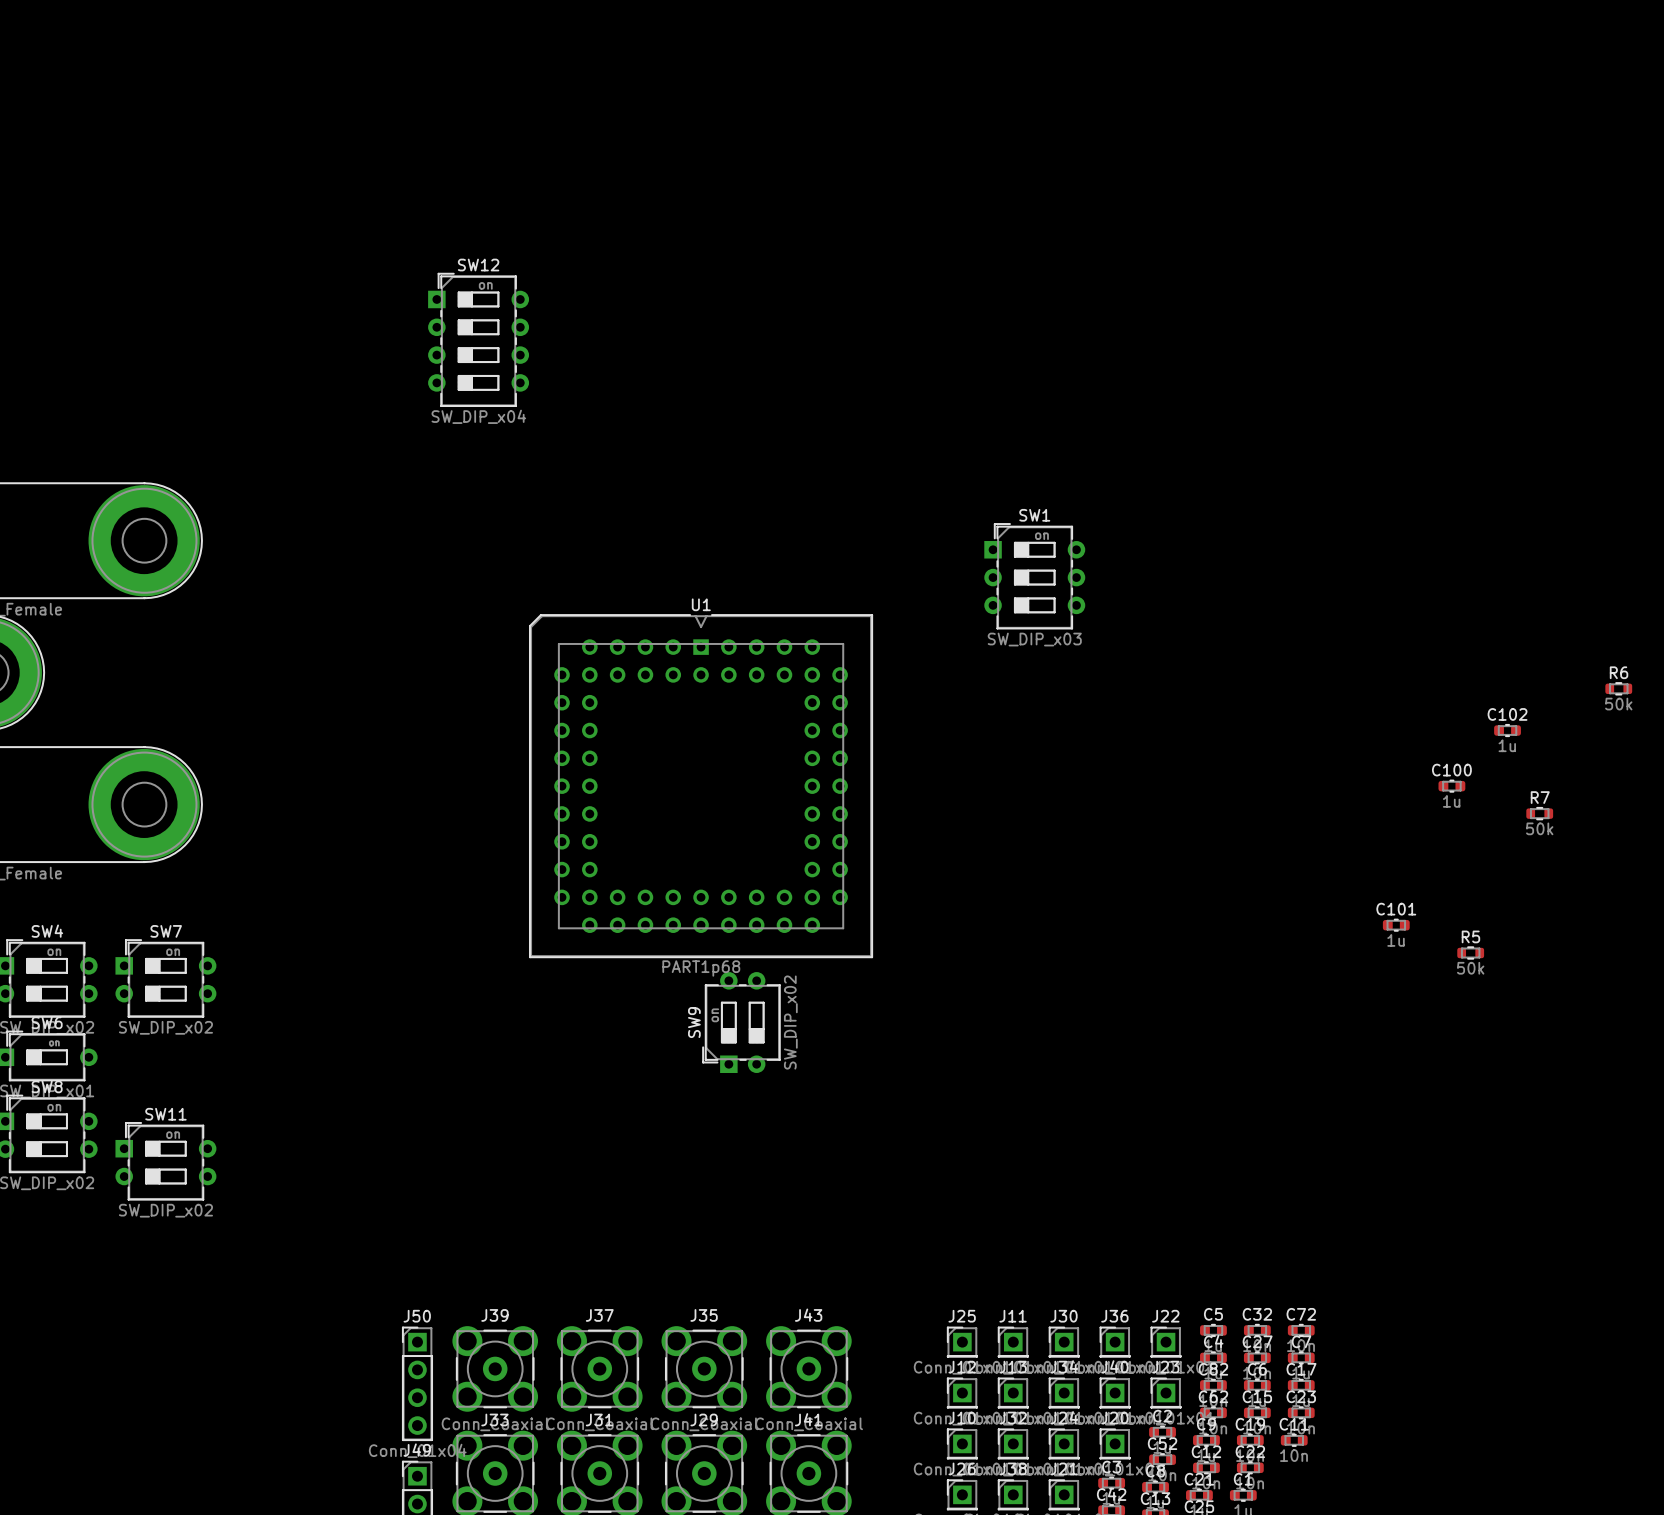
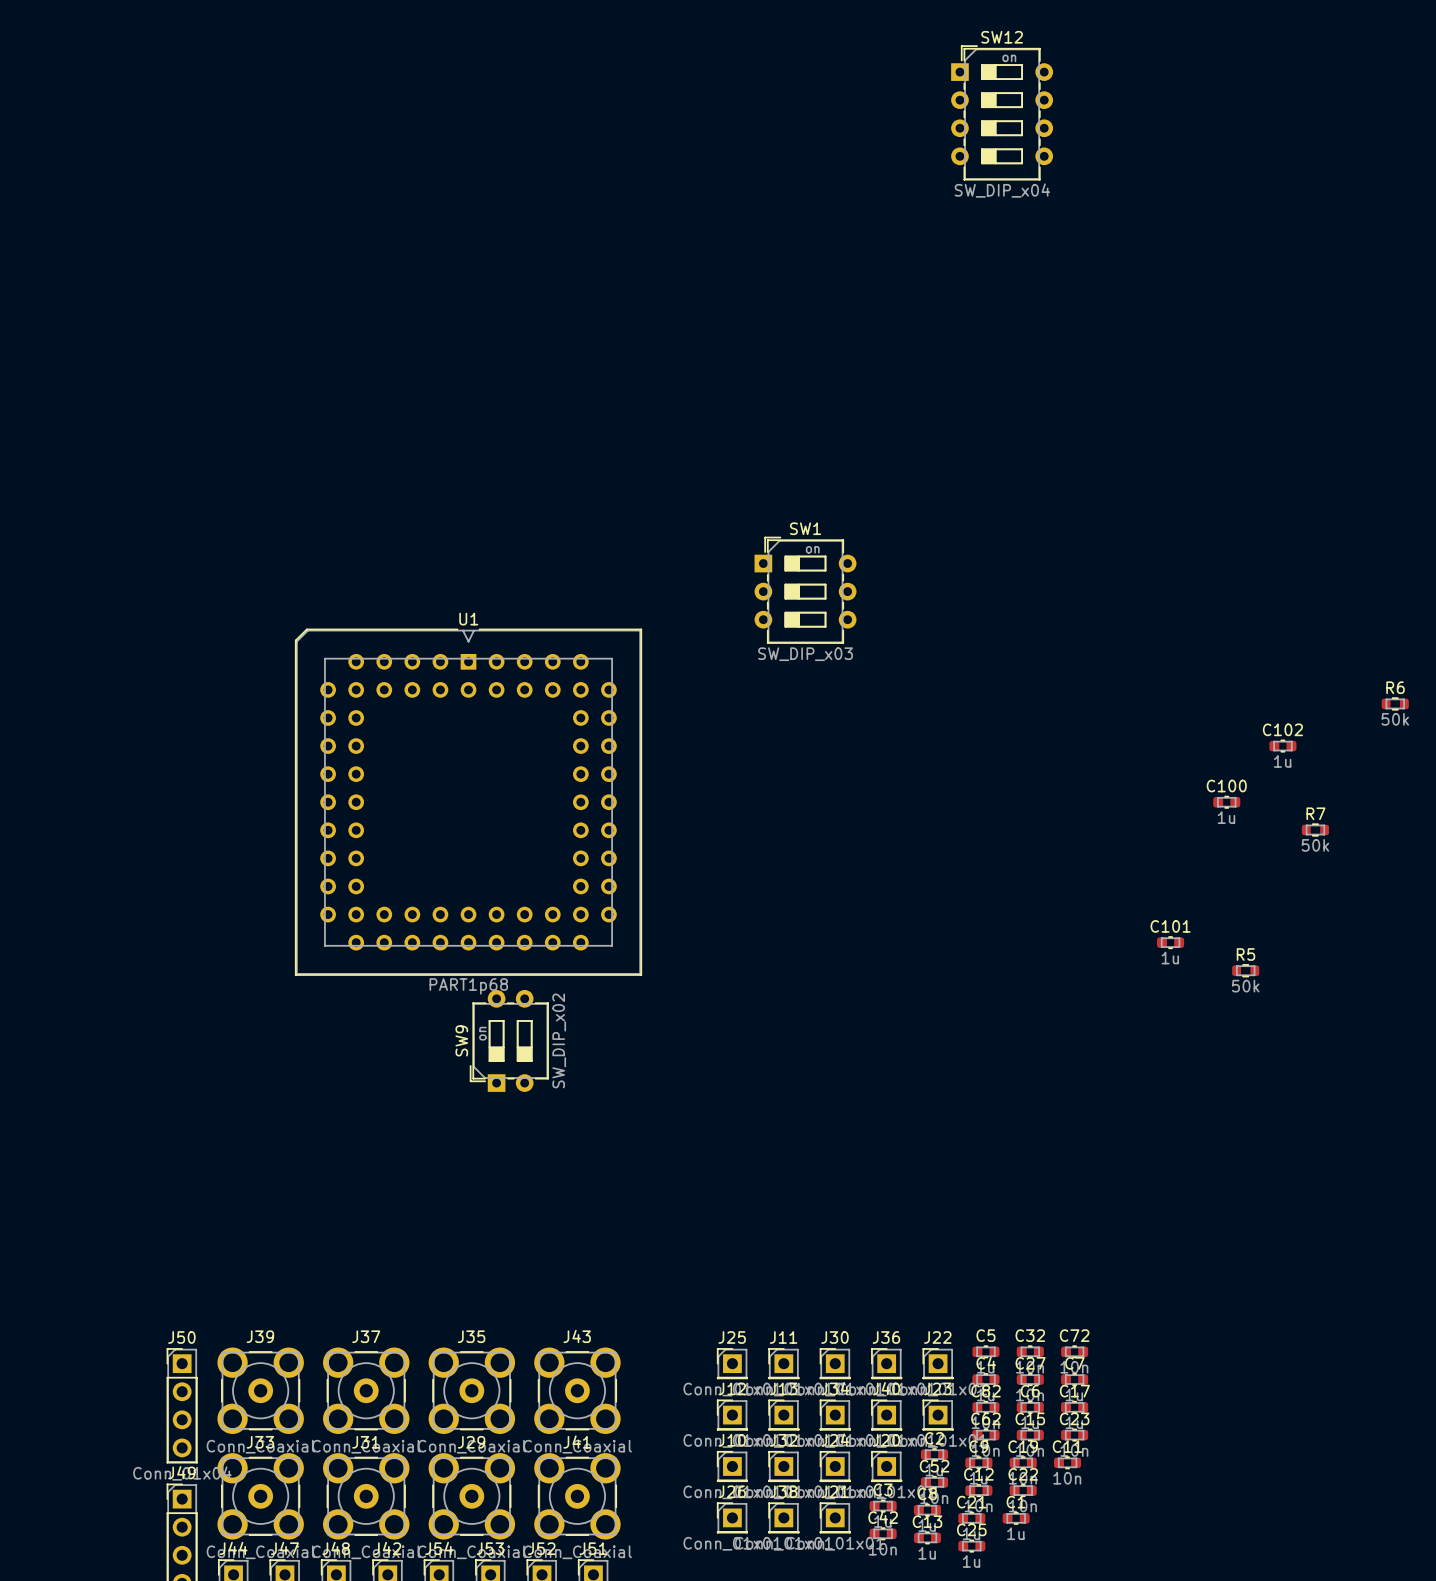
SW12 position: (478, 339) -> (1002, 112)

